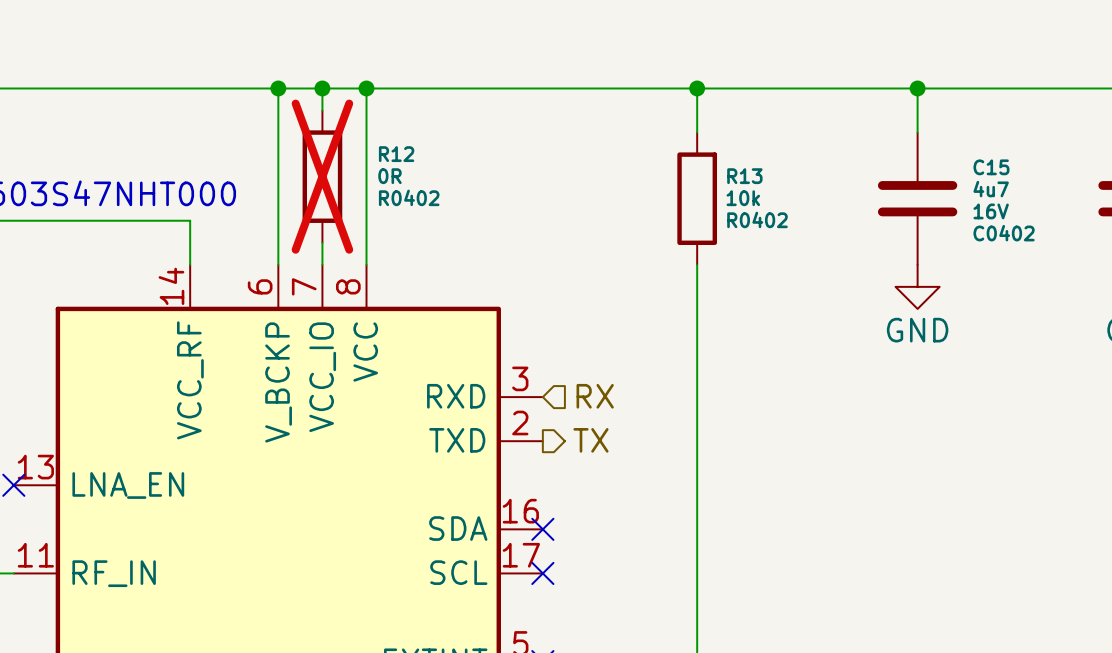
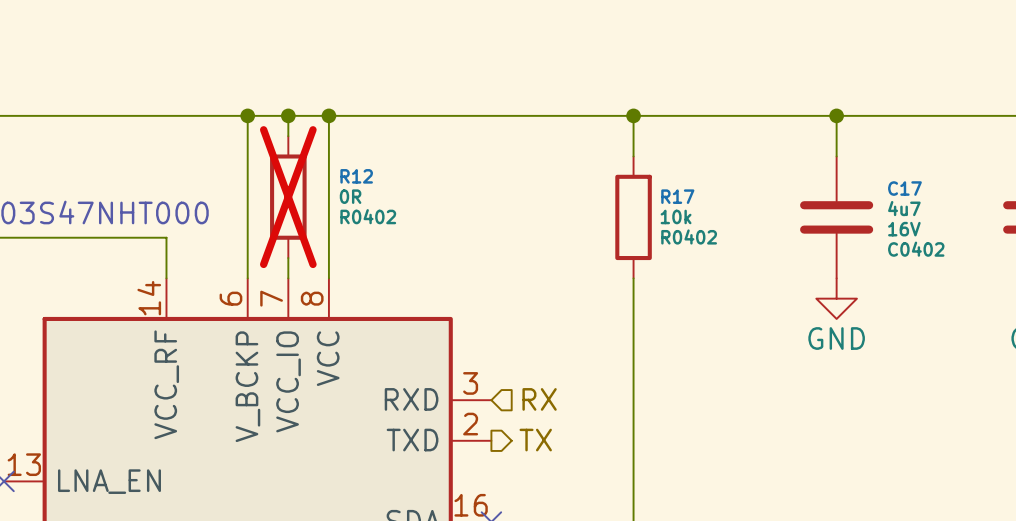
C15 name: C15 (991, 167) -> C17 (904, 188)
R13 name: R13 (744, 176) -> R17 (677, 196)

